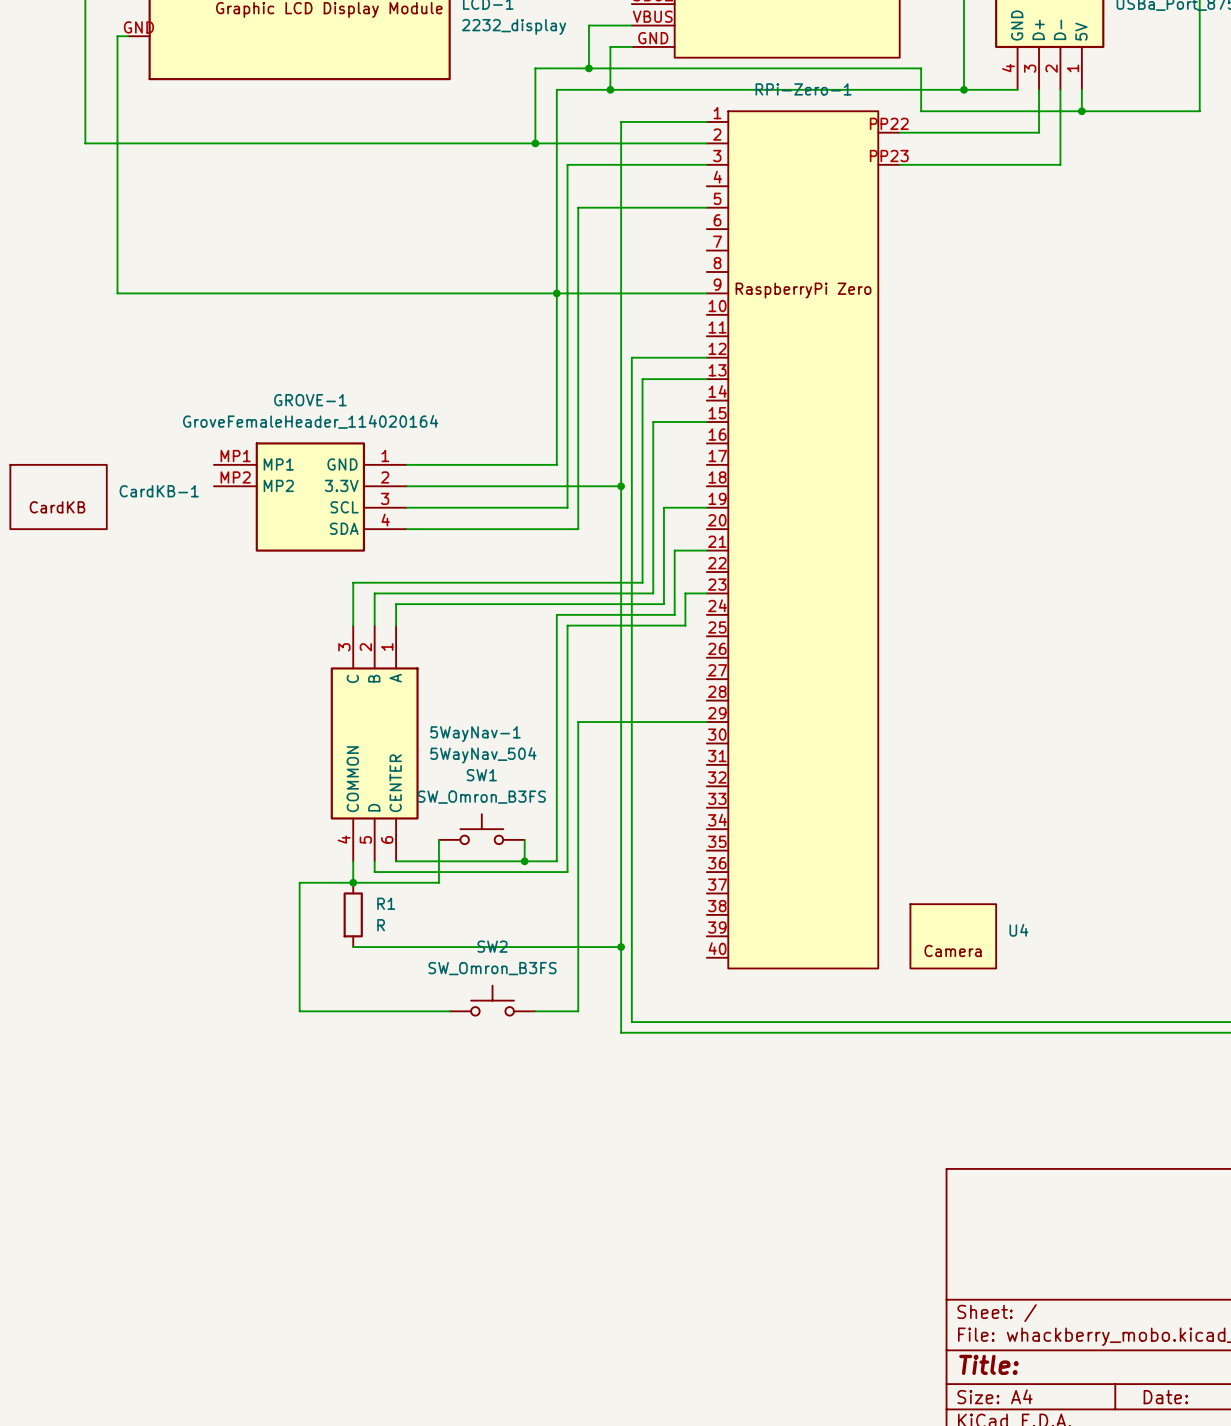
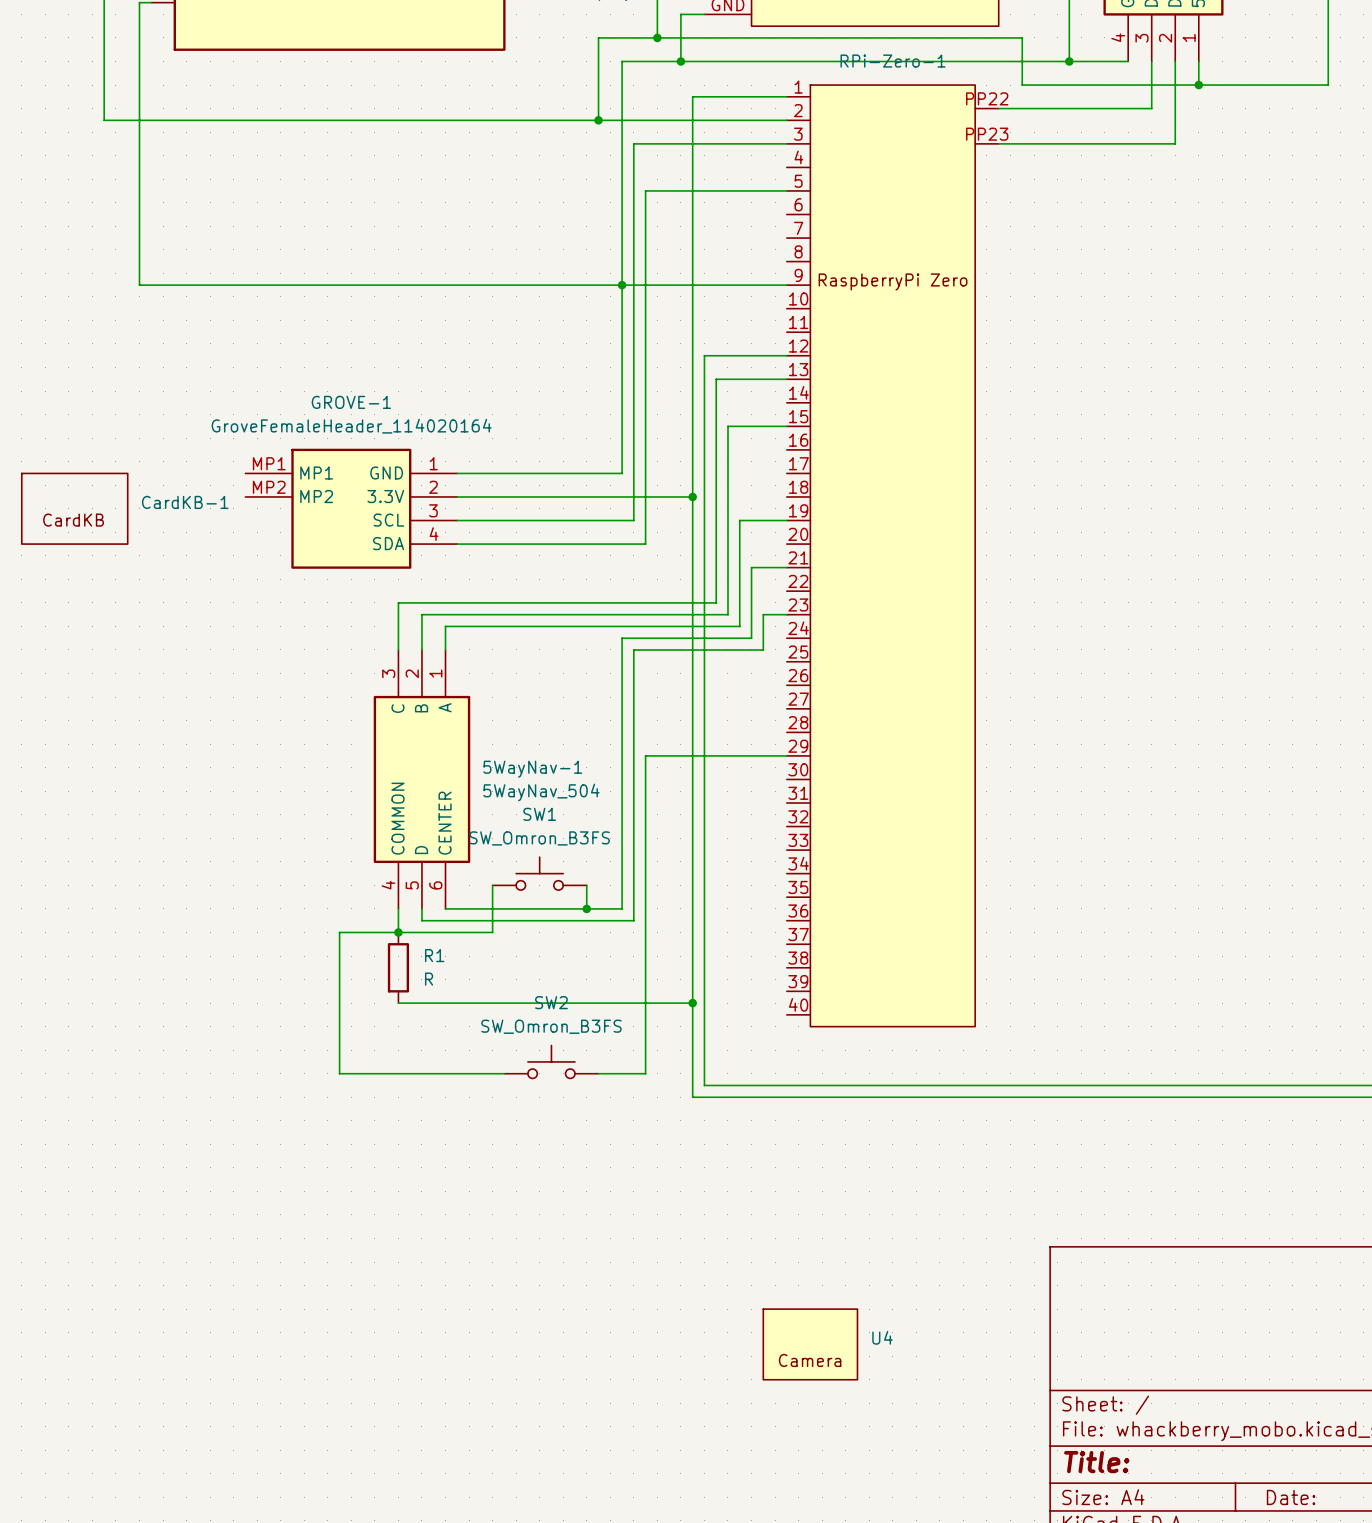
U4 position: (953, 936) -> (810, 1344)

